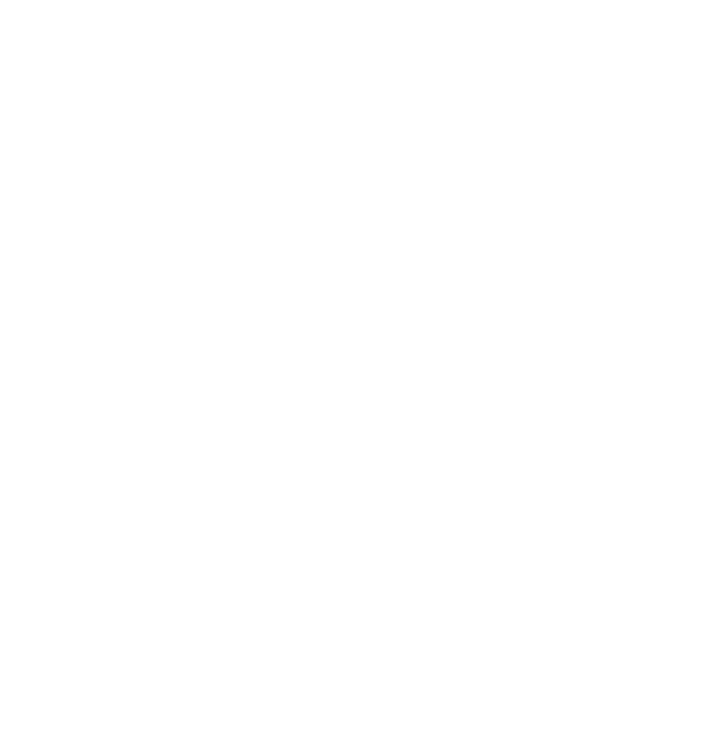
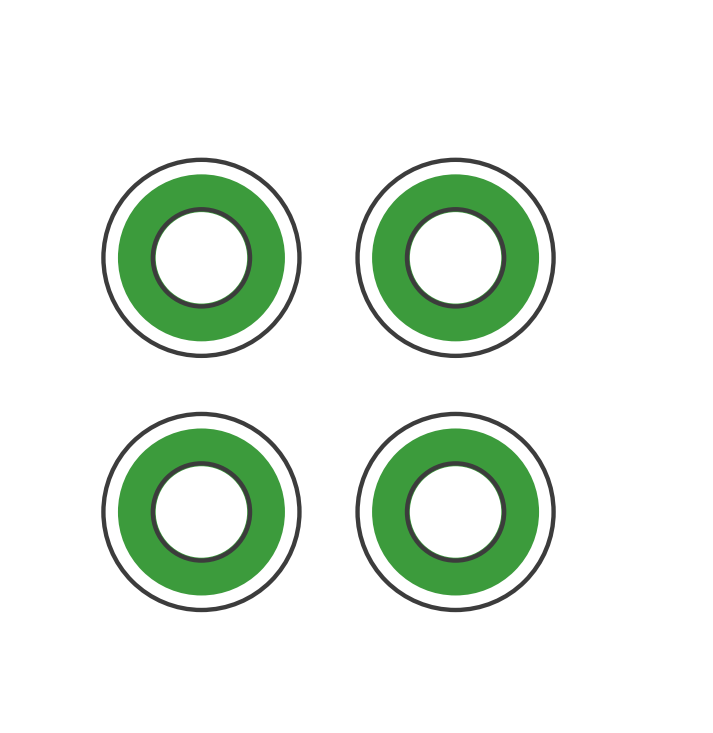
part: none -> (201, 257)
part: none -> (455, 257)
part: none -> (201, 511)
part: none -> (455, 511)

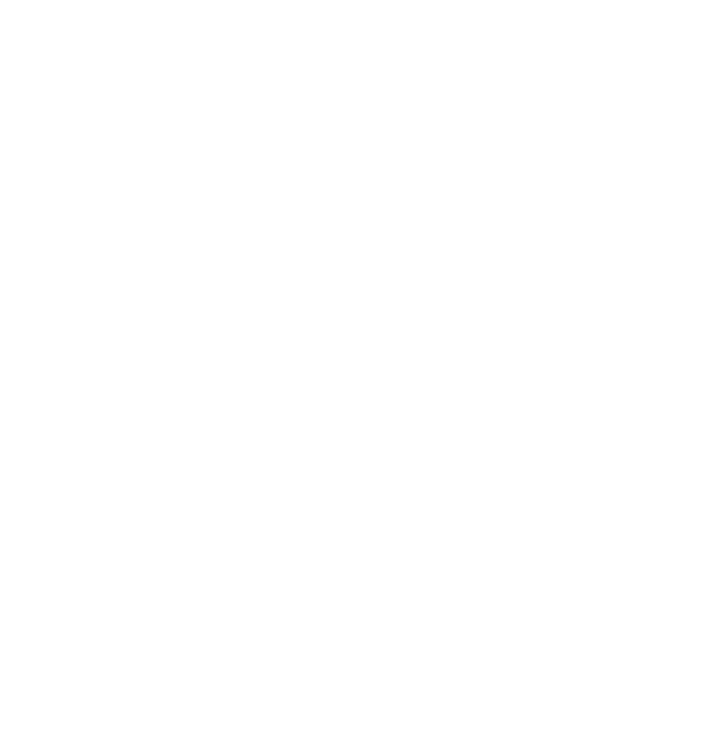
part: (201, 257) -> none
part: (455, 257) -> none
part: (201, 511) -> none
part: (455, 511) -> none

